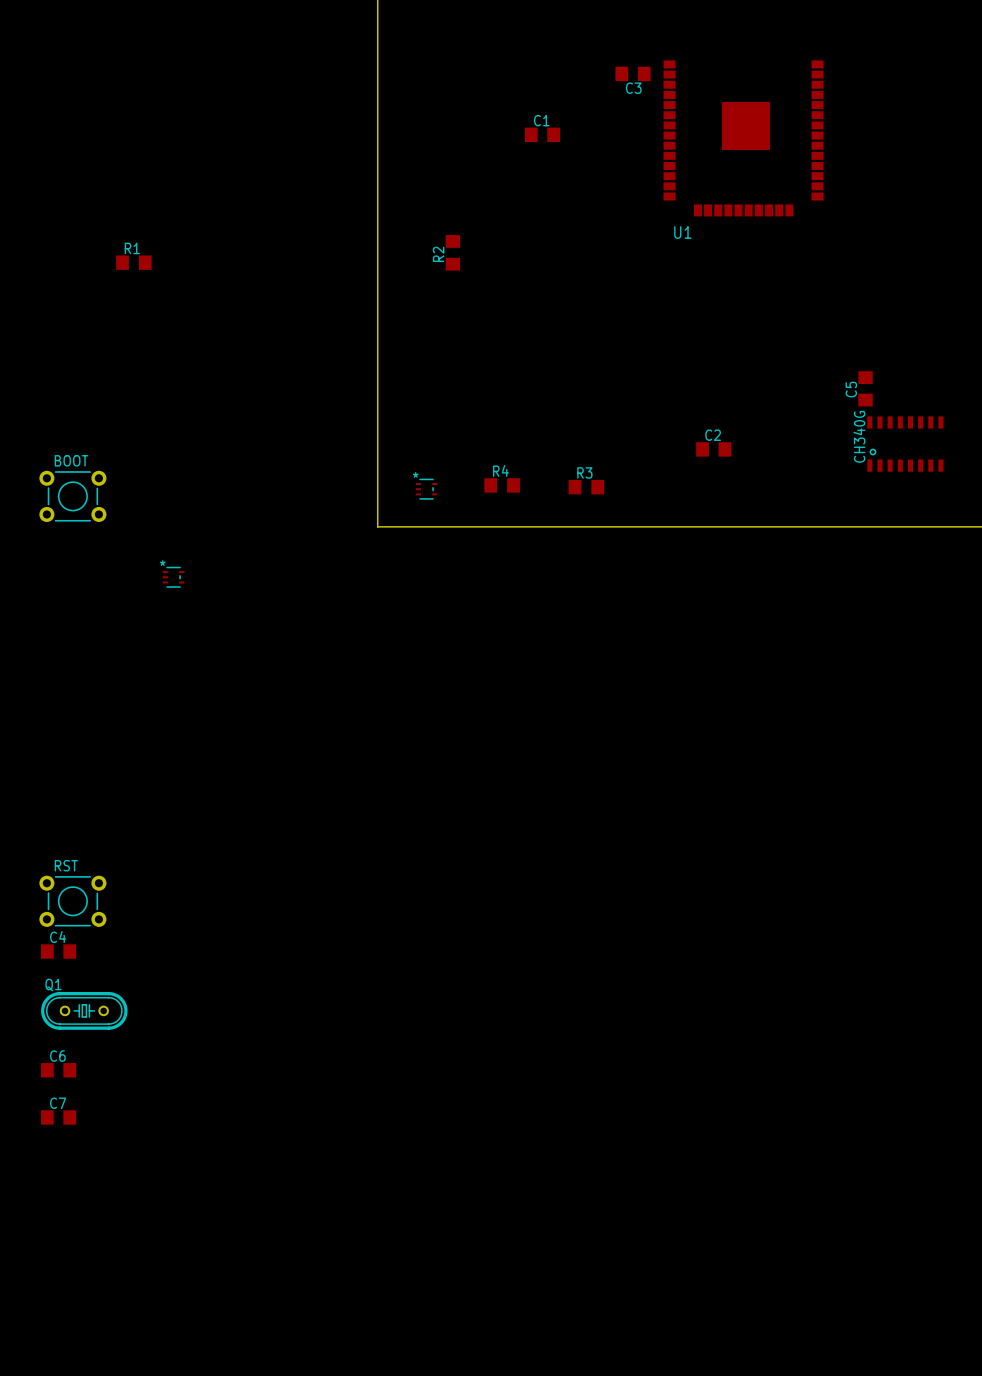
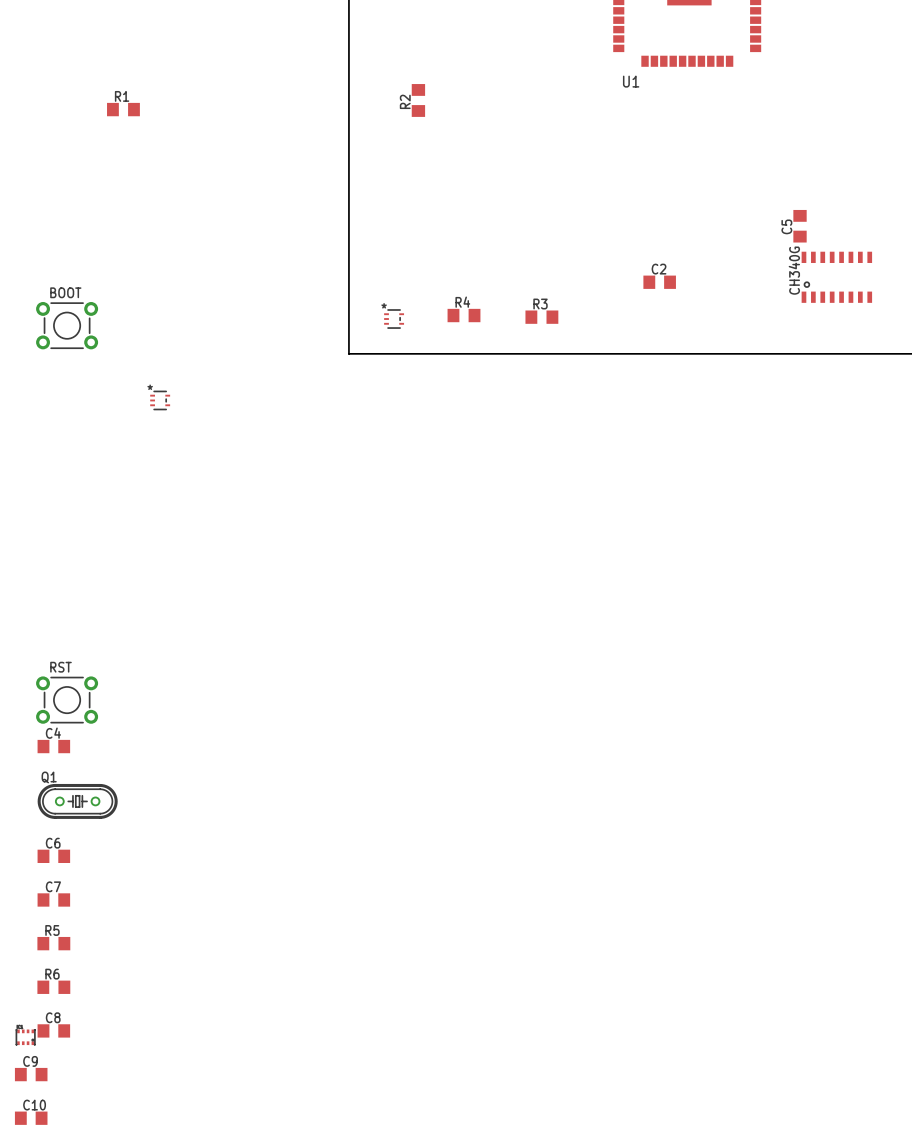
R5: none -> (53, 943)
R6: none -> (53, 987)
C8: none -> (53, 1030)
part: none -> (25, 1037)
C9: none -> (31, 1074)
C10: none -> (31, 1118)

